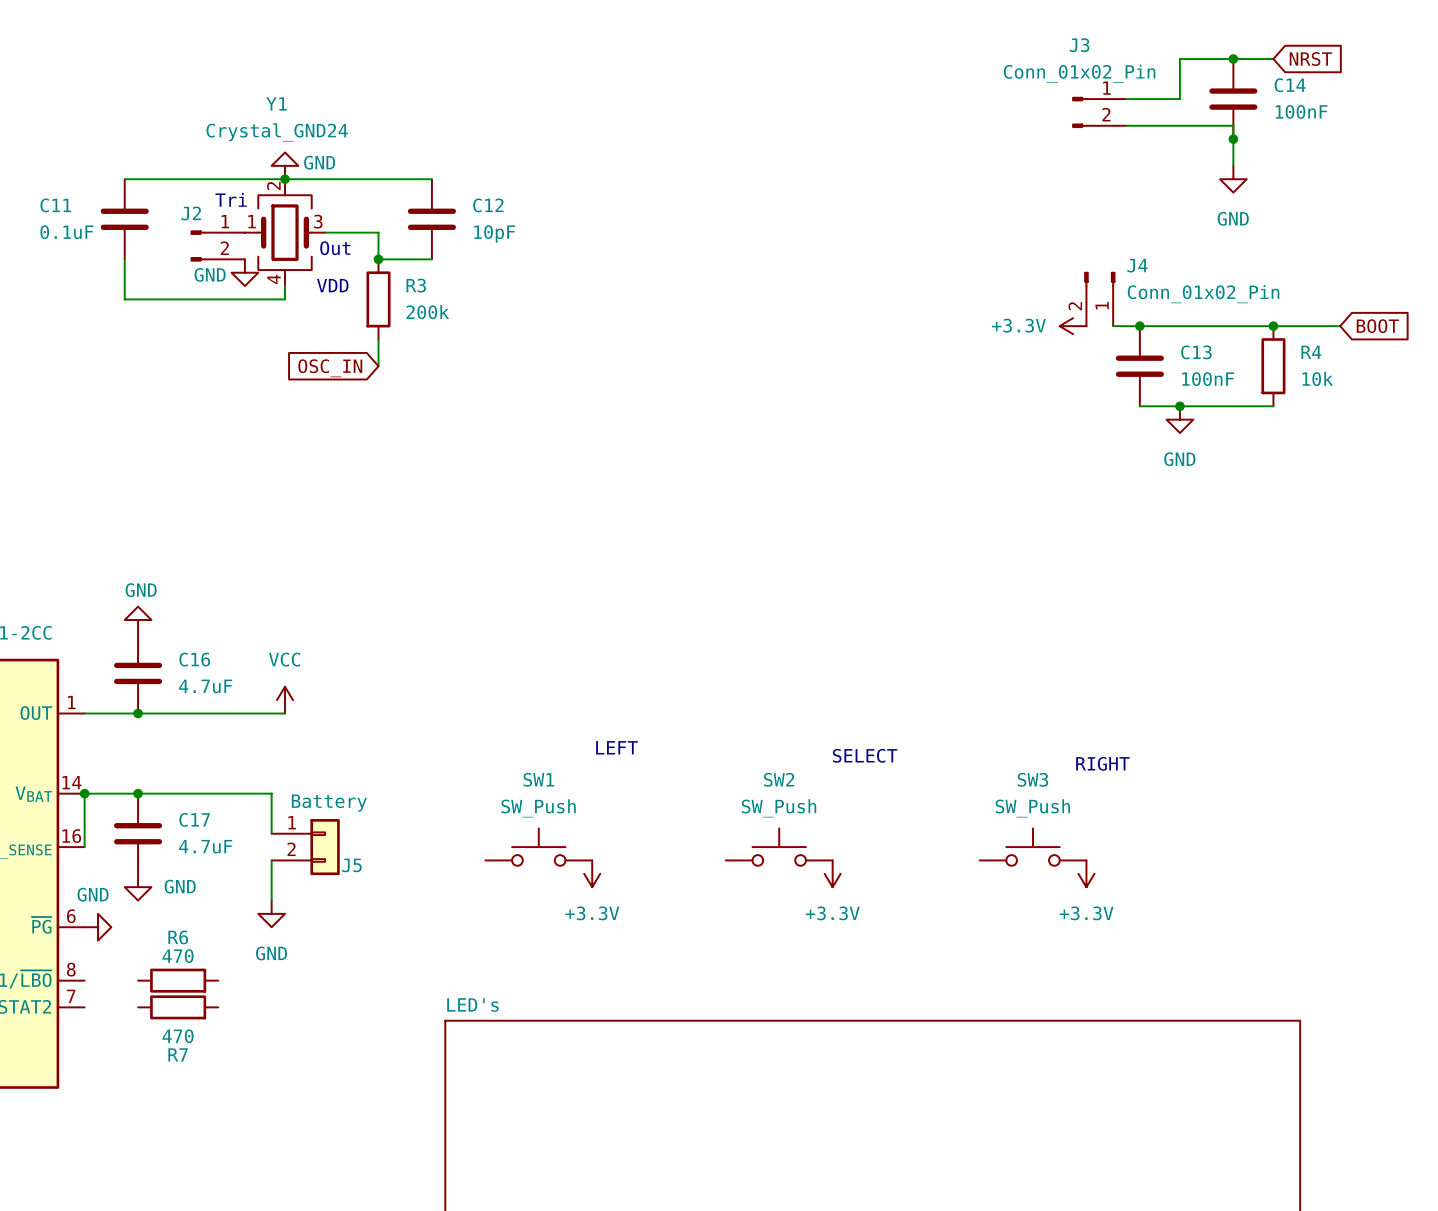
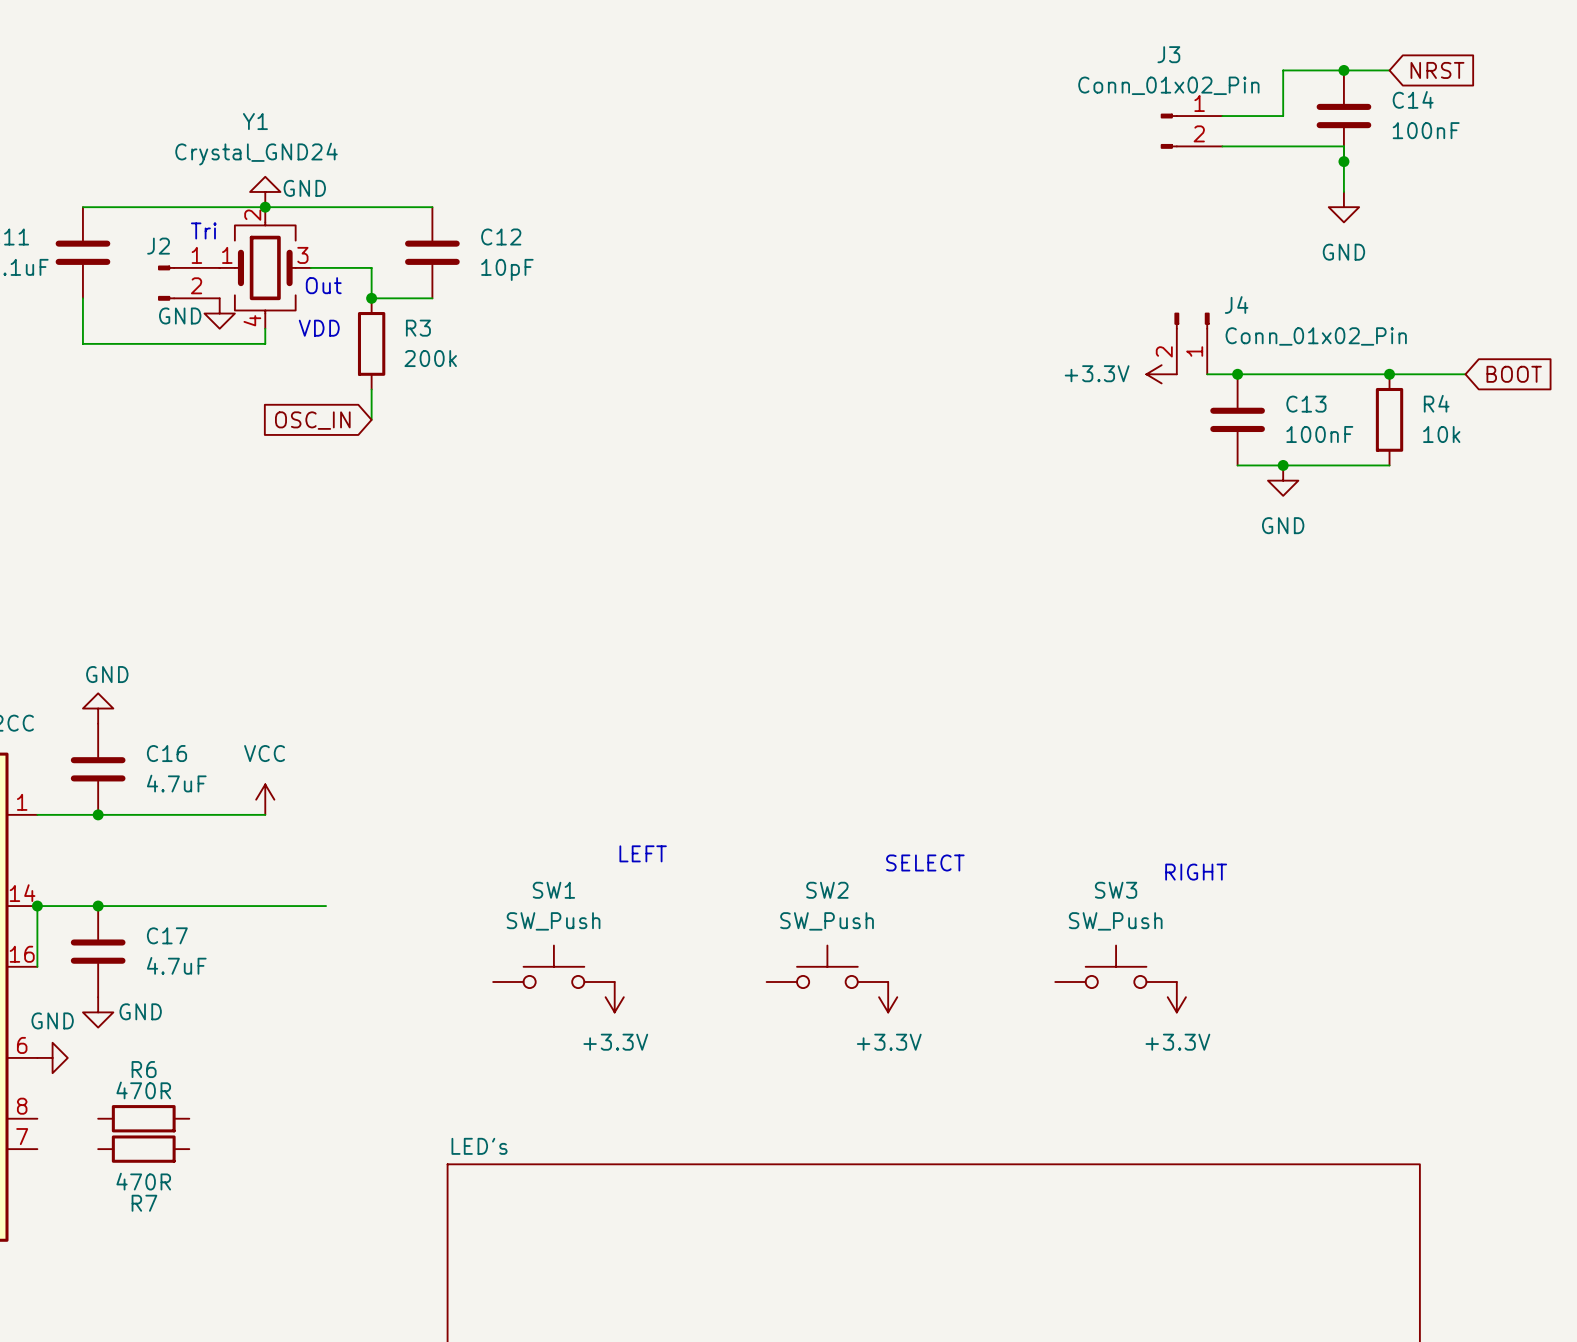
wire: (271, 793) (271, 833) -> (250, 906) (326, 906)
J5: Battery (305, 847) -> none
wire: (271, 860) (271, 900) -> none
power symbol: GND (271, 913) -> none
R6 value: 470 (178, 956) -> 470R (143, 1090)
R7 value: 470 (178, 1036) -> 470R (143, 1181)

